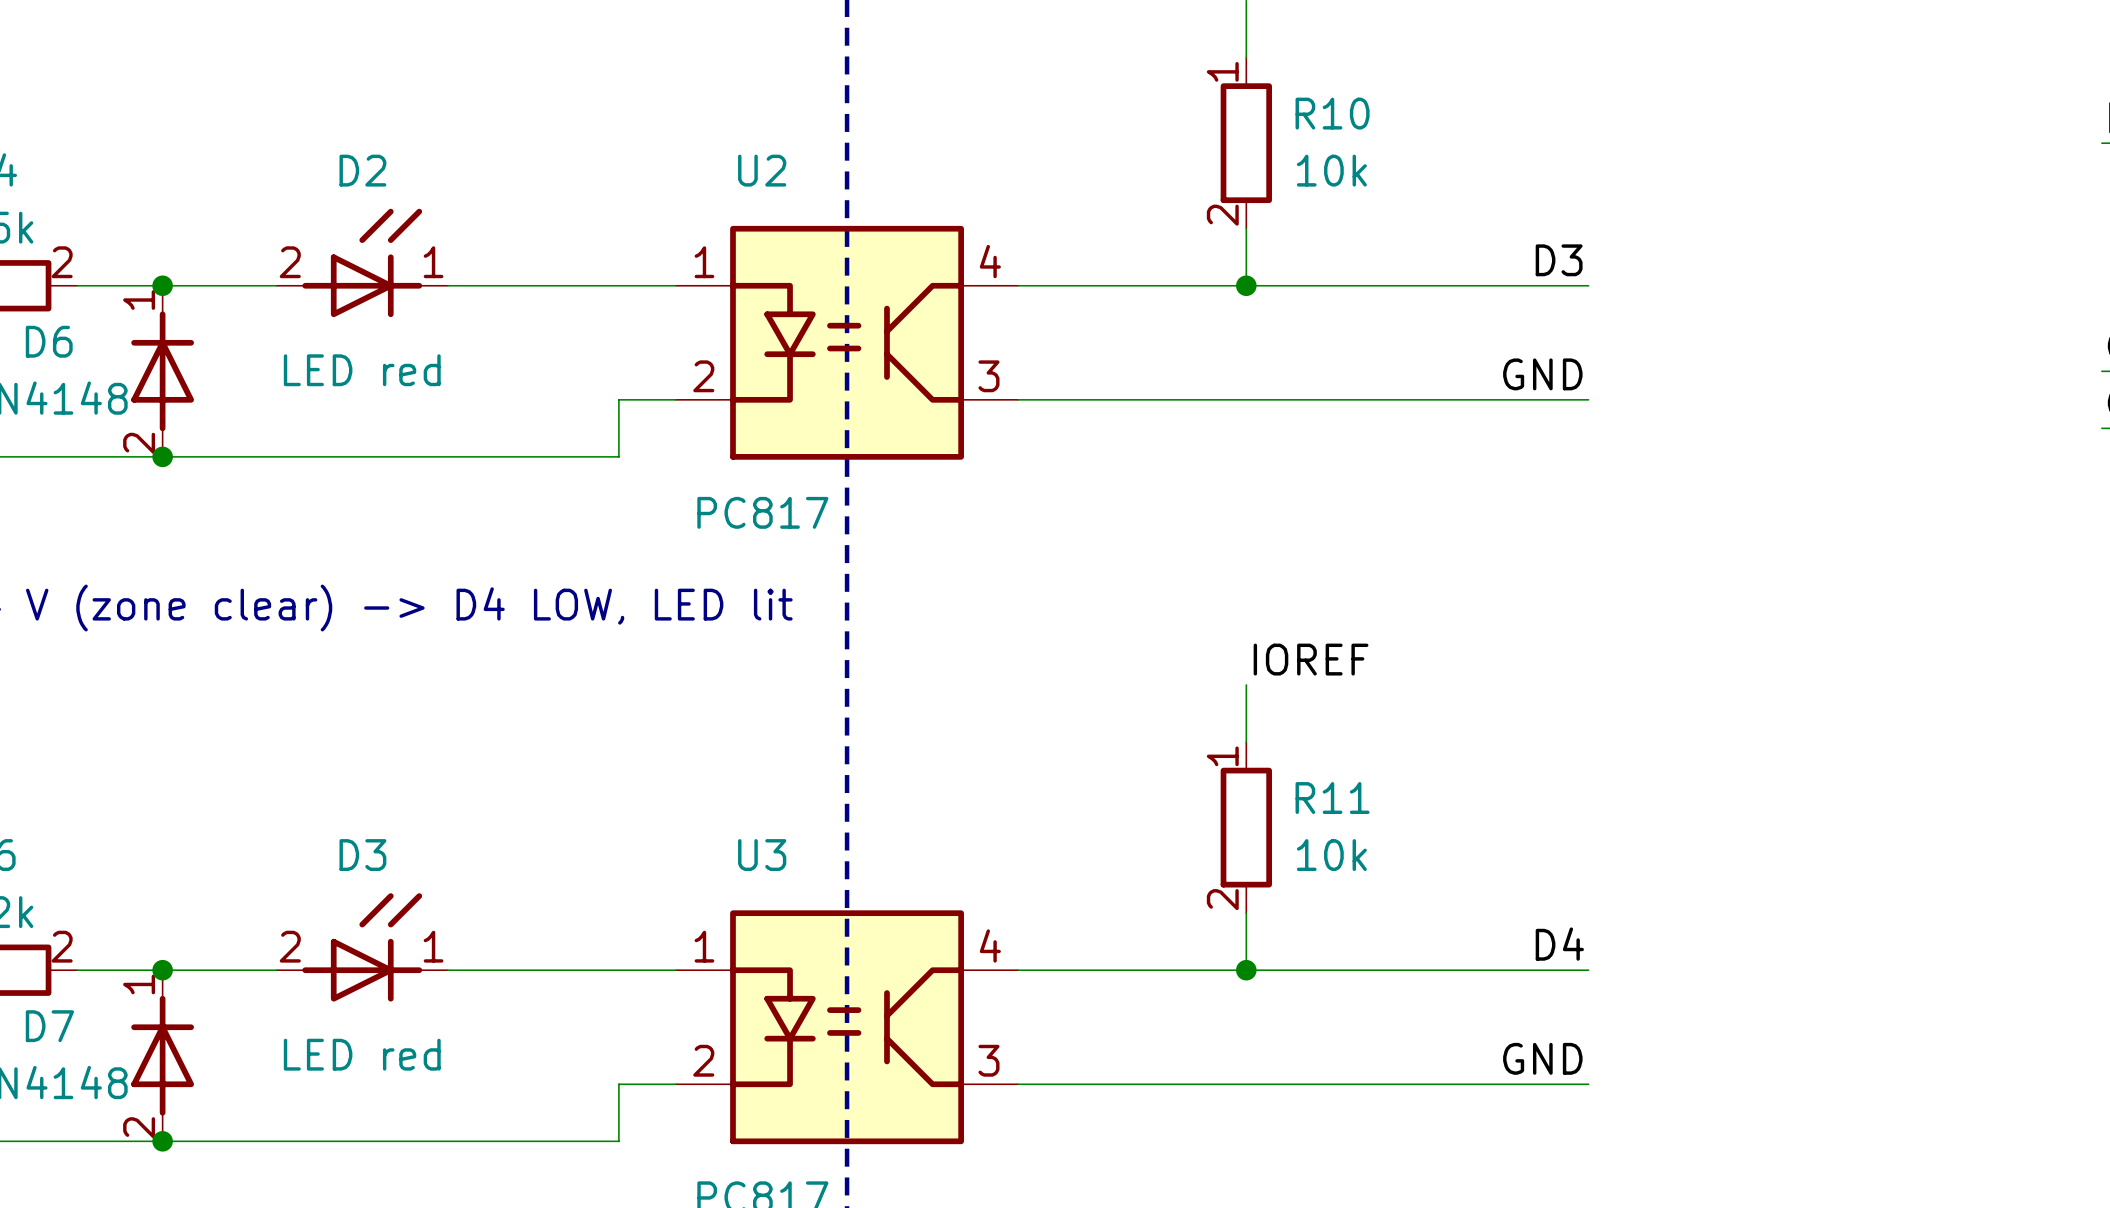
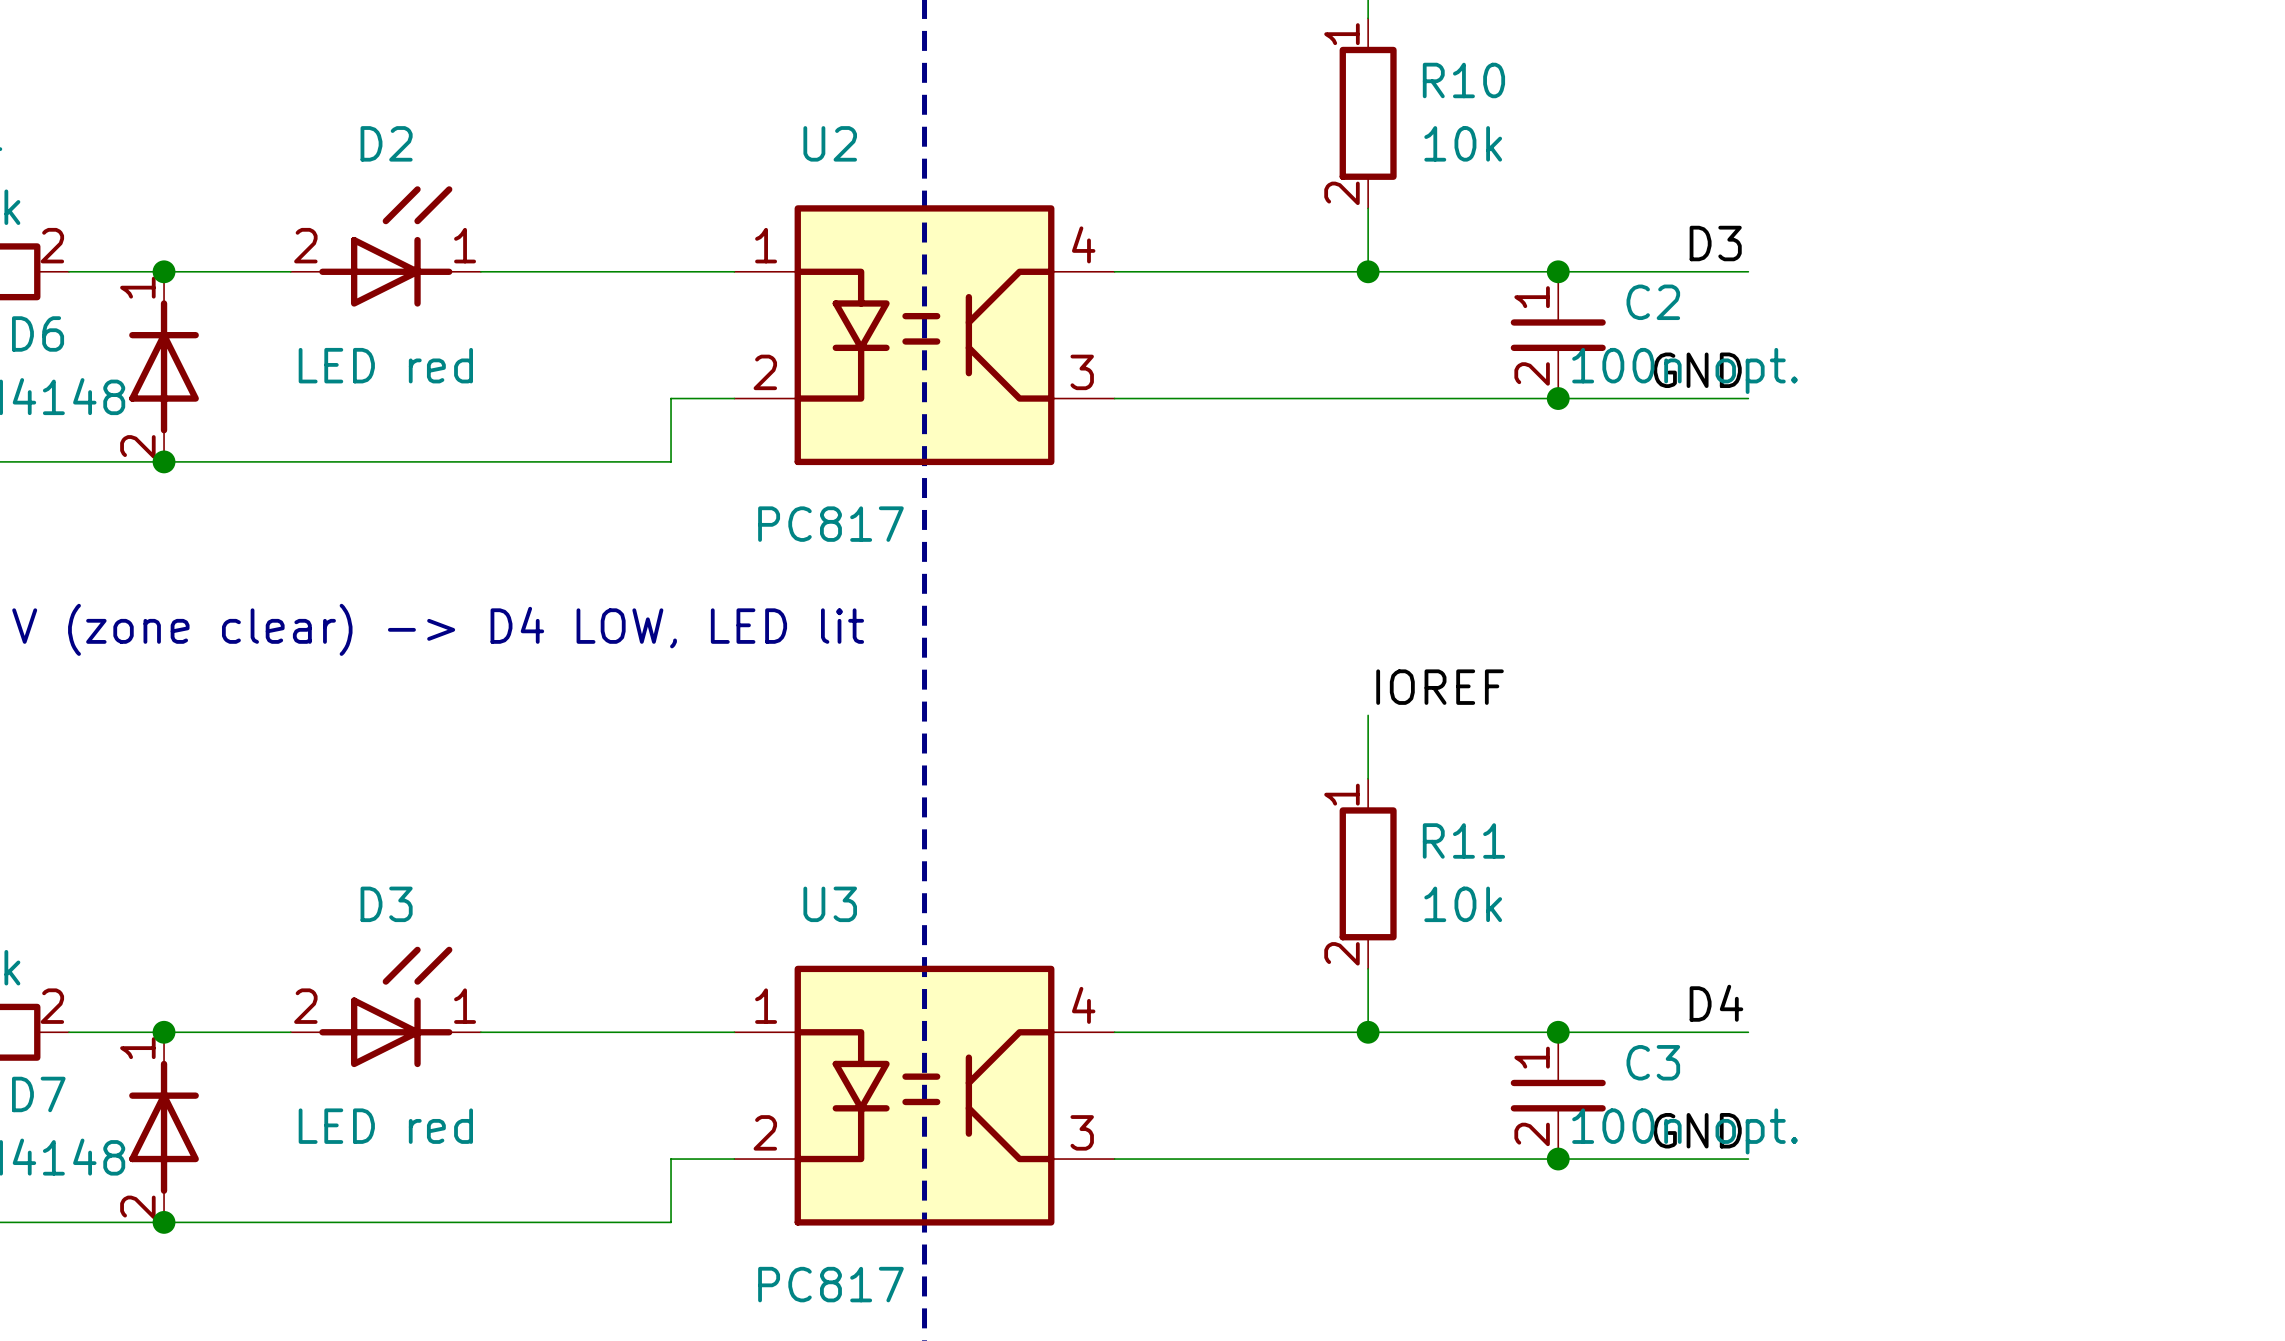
junction: none -> (1558, 271)
C2: none -> 100n opt. (1558, 335)
junction: none -> (1558, 398)
junction: none -> (1558, 1032)
C3: none -> 100n opt. (1558, 1095)
junction: none -> (1558, 1159)

